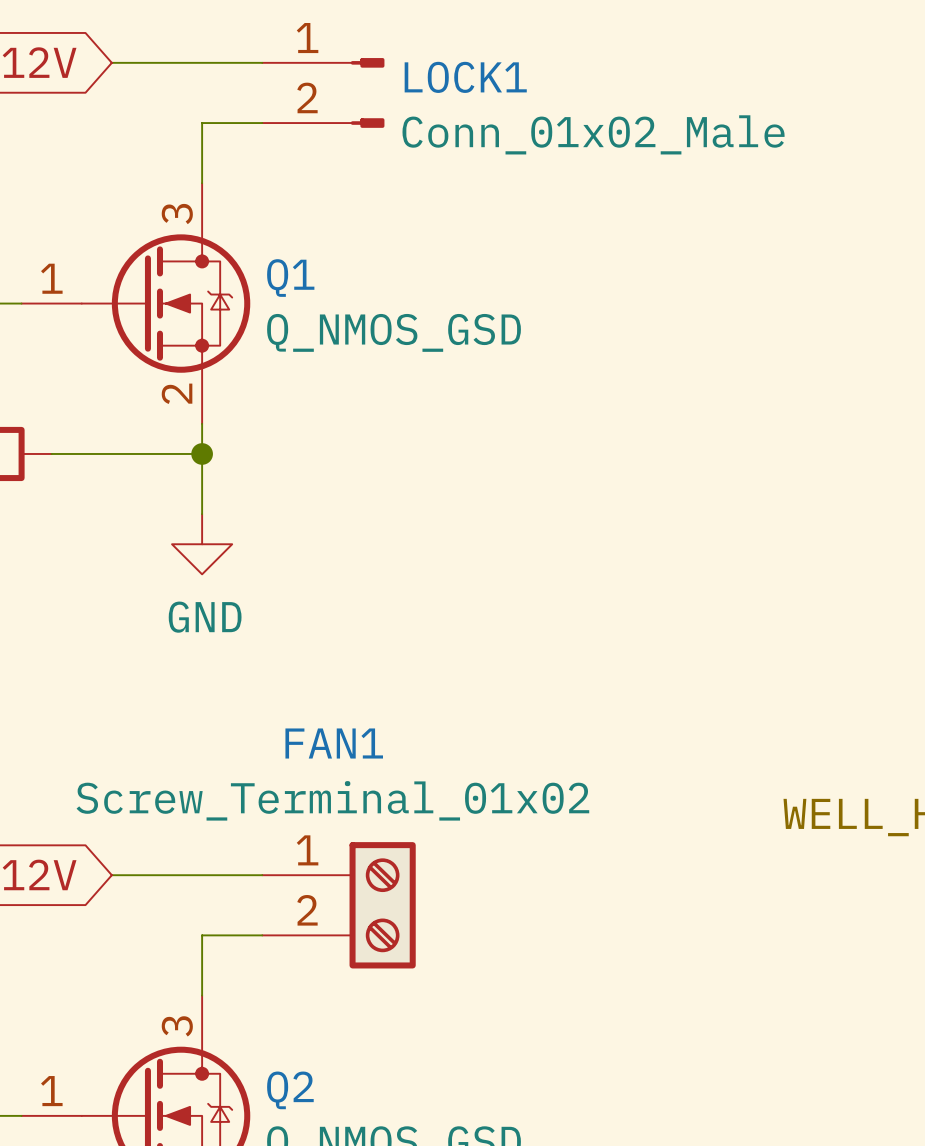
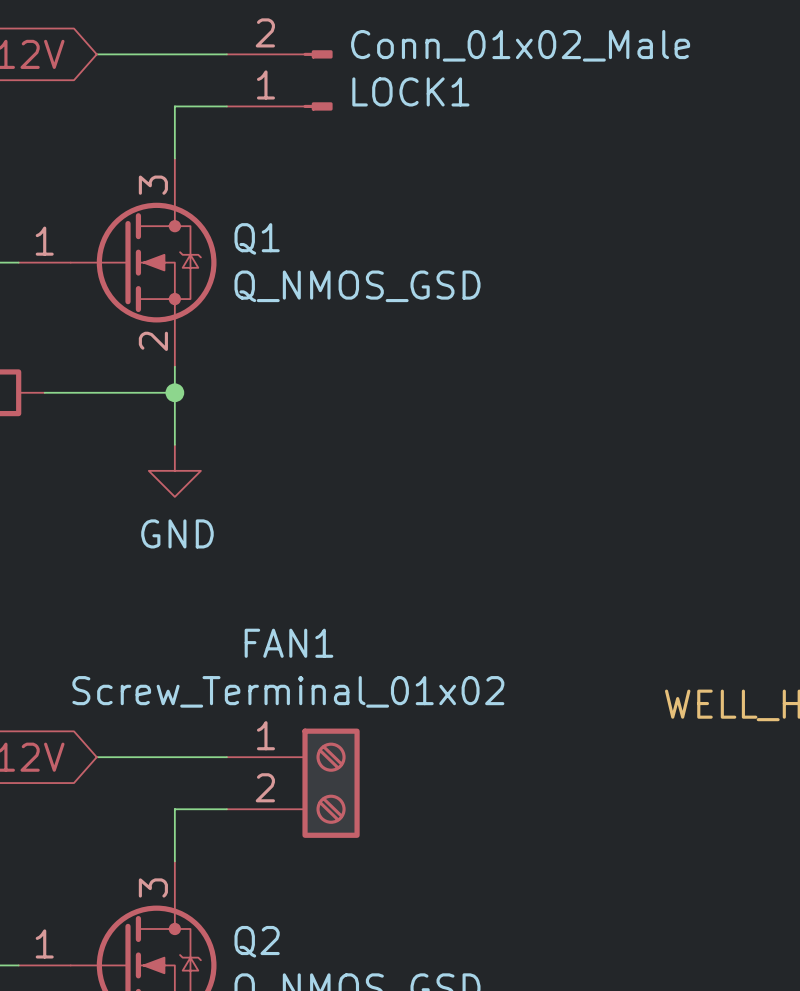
LOCK1 flip: as is (367, 92) -> up-down (318, 80)

